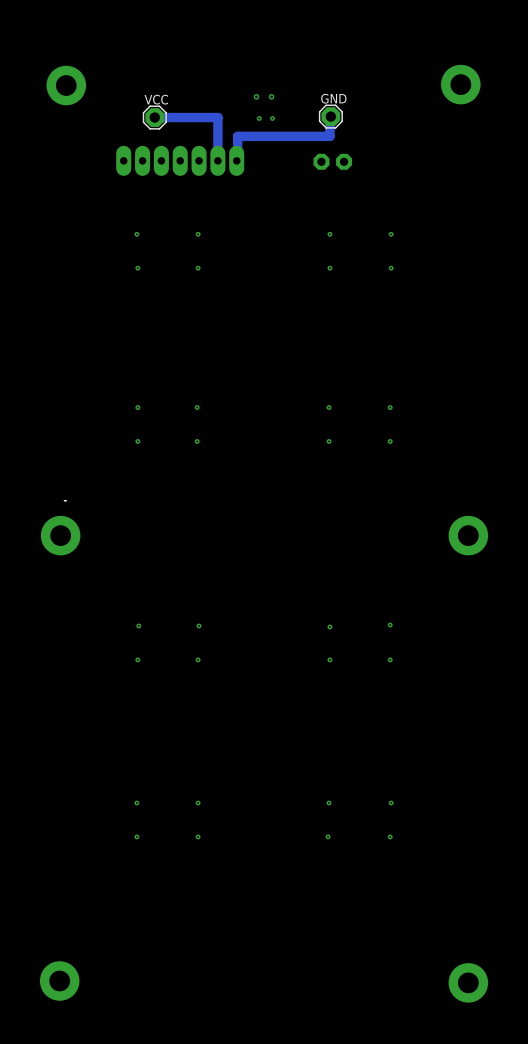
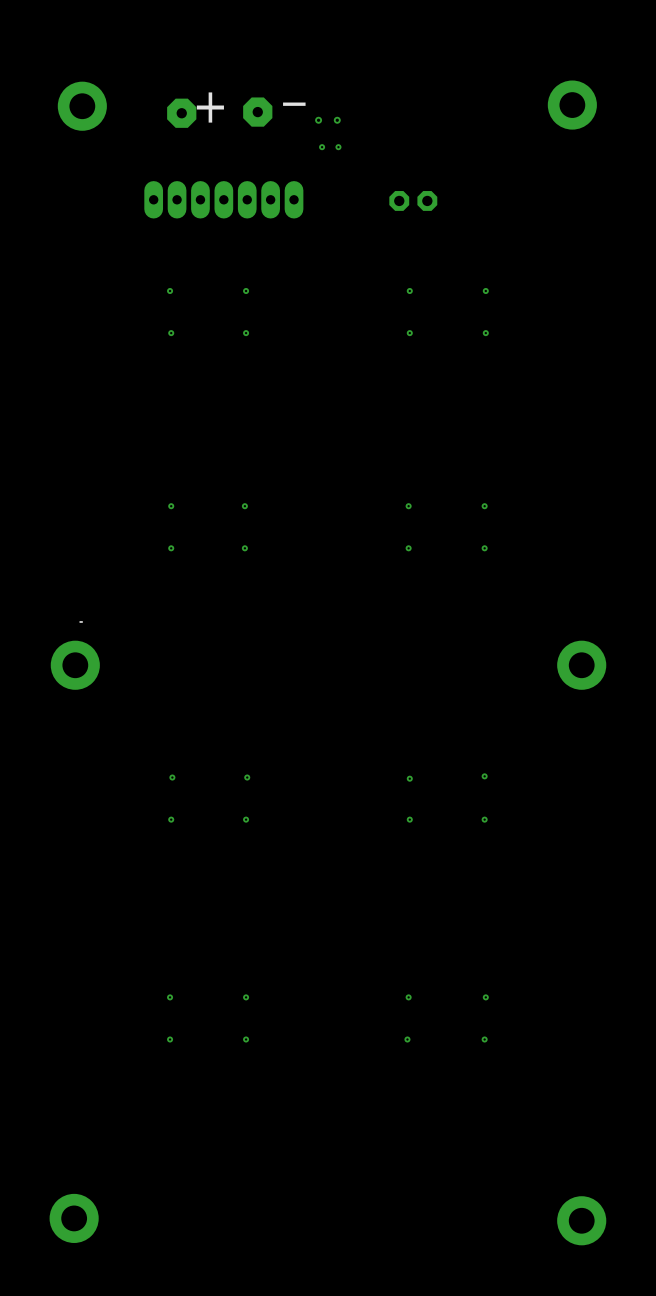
text: none -> _ (294, 104)
text: none -> + (210, 107)
part: none -> (257, 112)
part: none -> (181, 113)
track: (329, 116) (329, 136) (237, 136) (237, 151) -> none
GND: (330, 116) -> none
VCC: (154, 117) -> none
track: (157, 117) (217, 117) (217, 152) -> none

